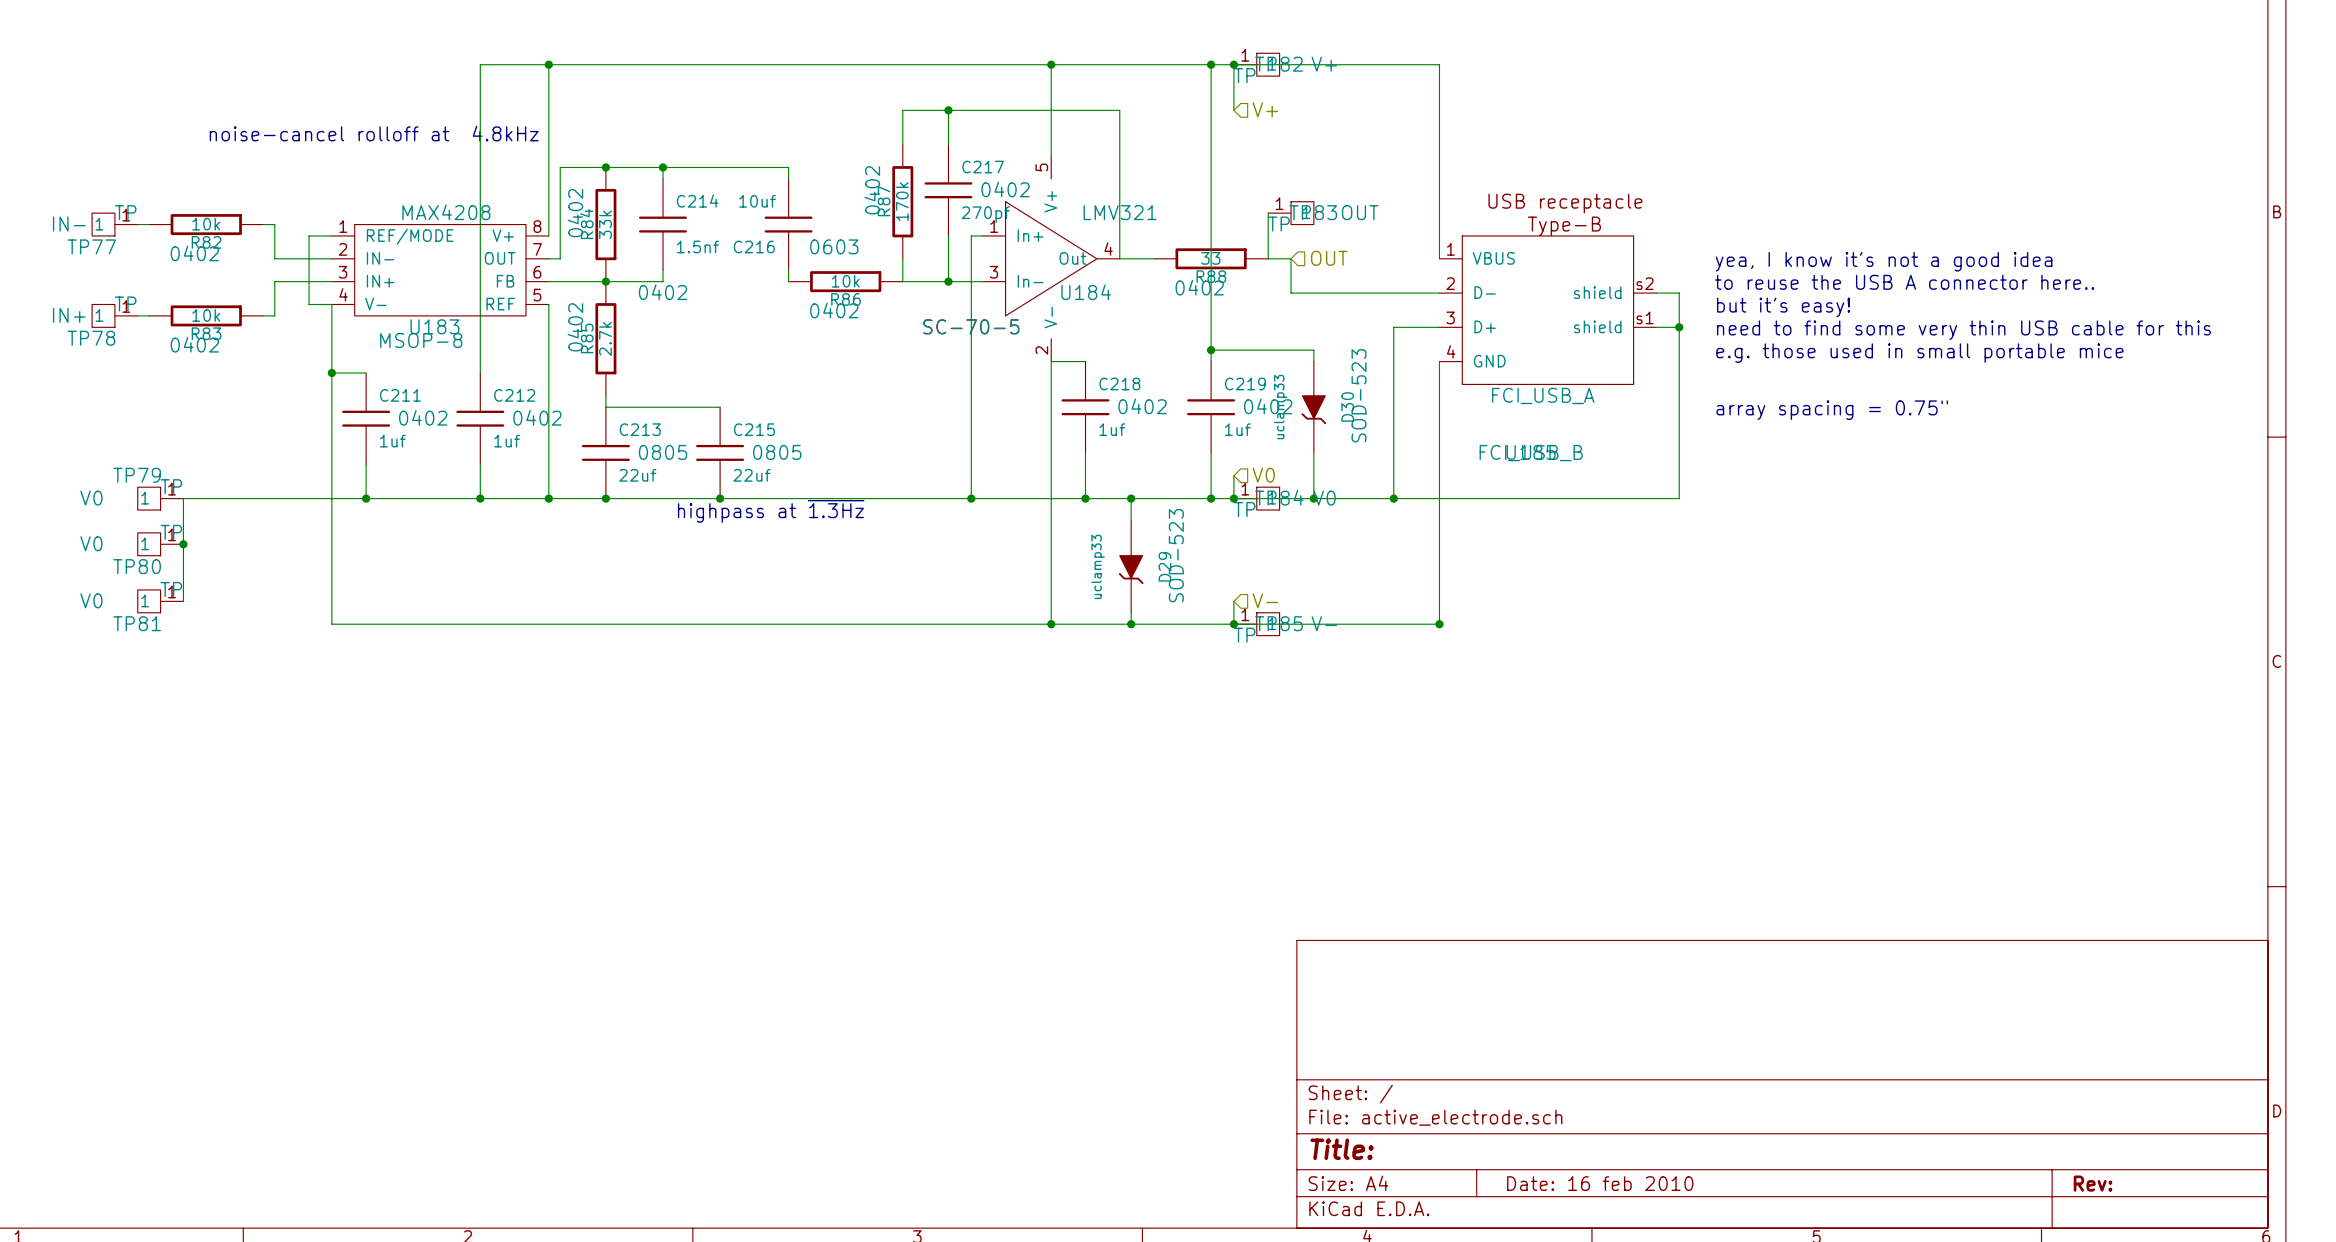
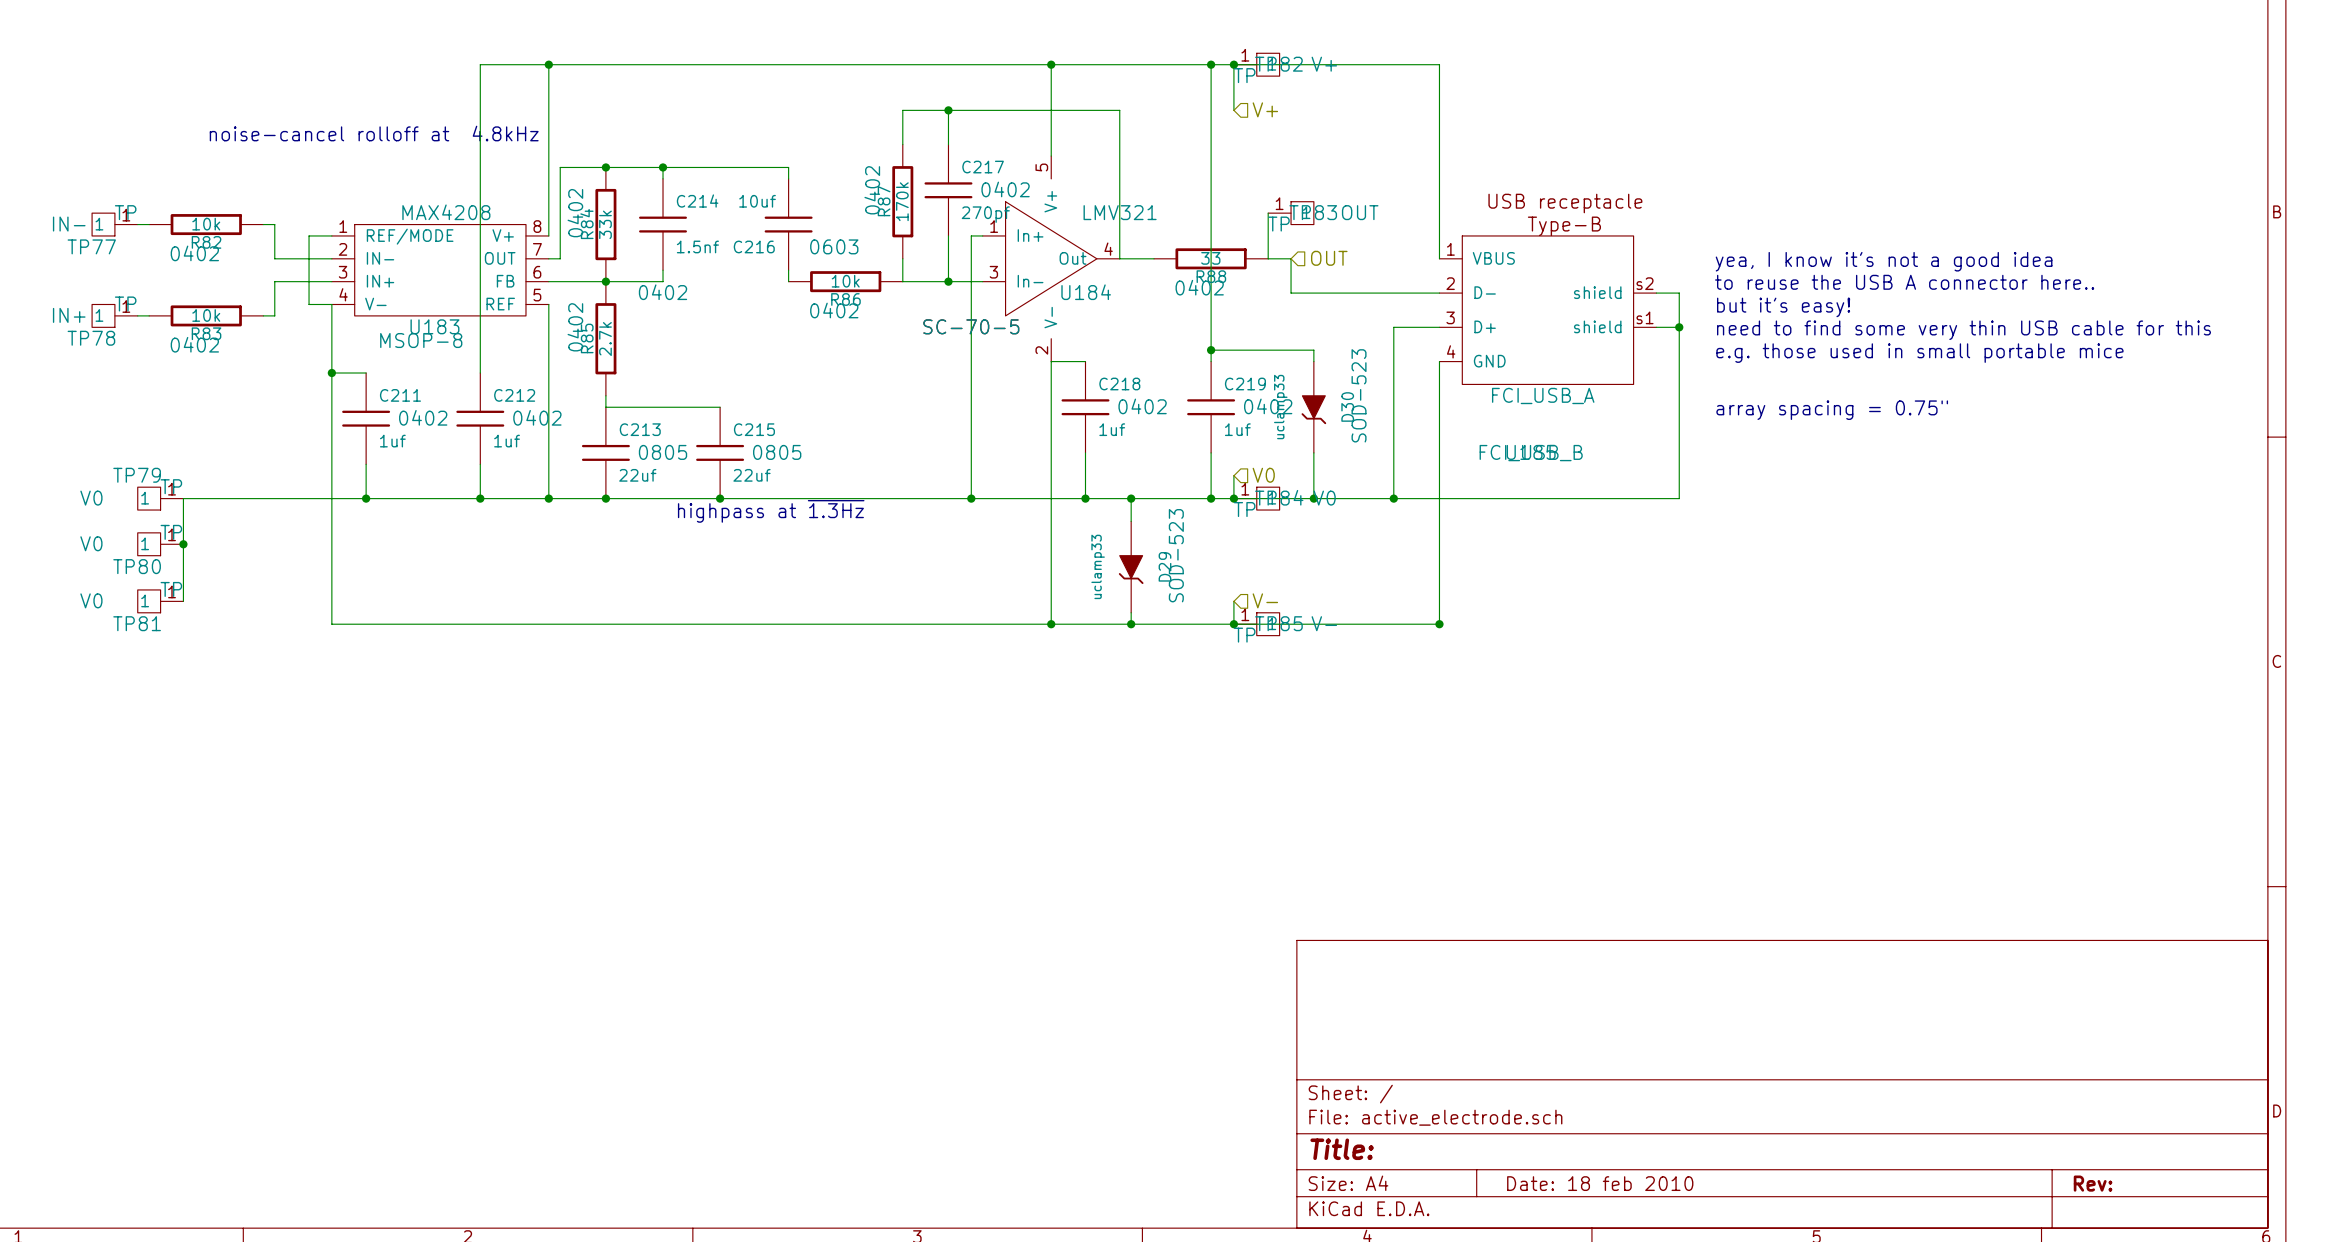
title block: Date: 16 feb 2010 (1600, 1183) -> Date: 18 feb 2010 (1600, 1183)

